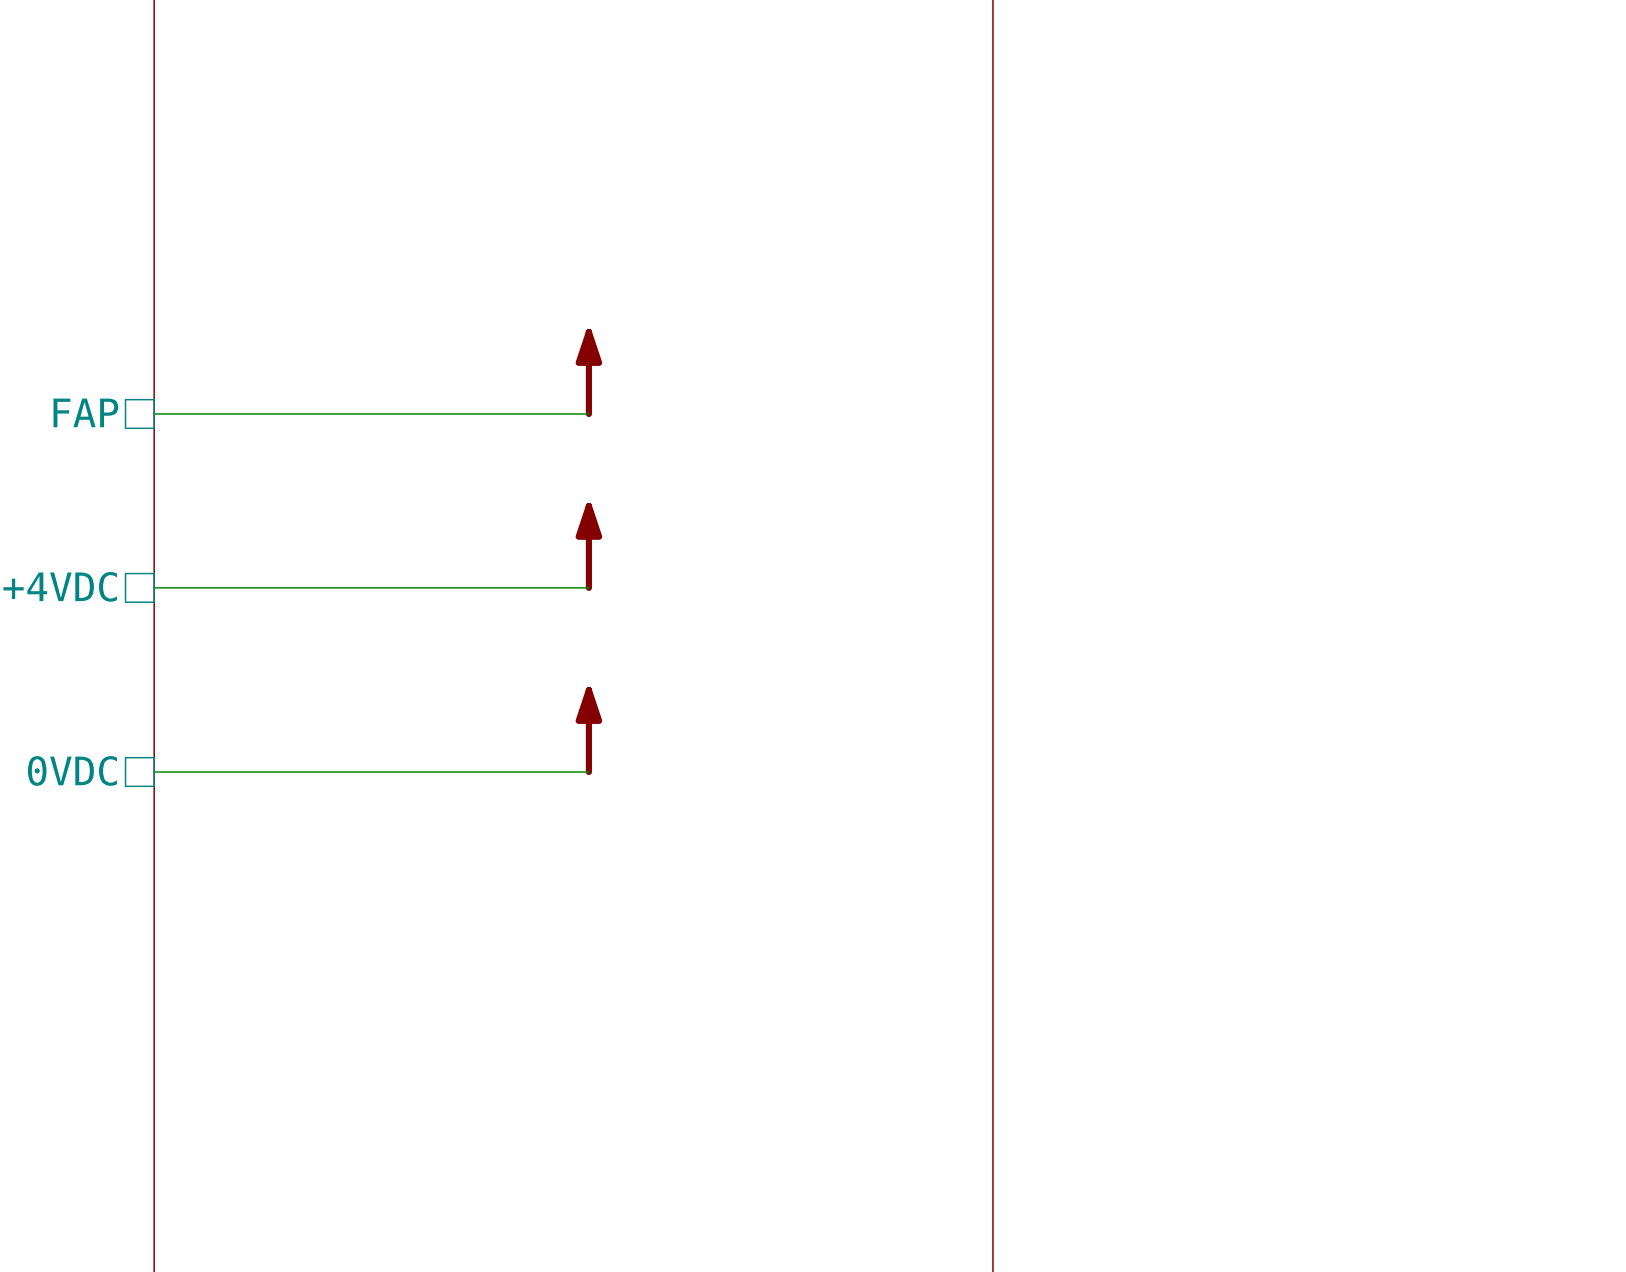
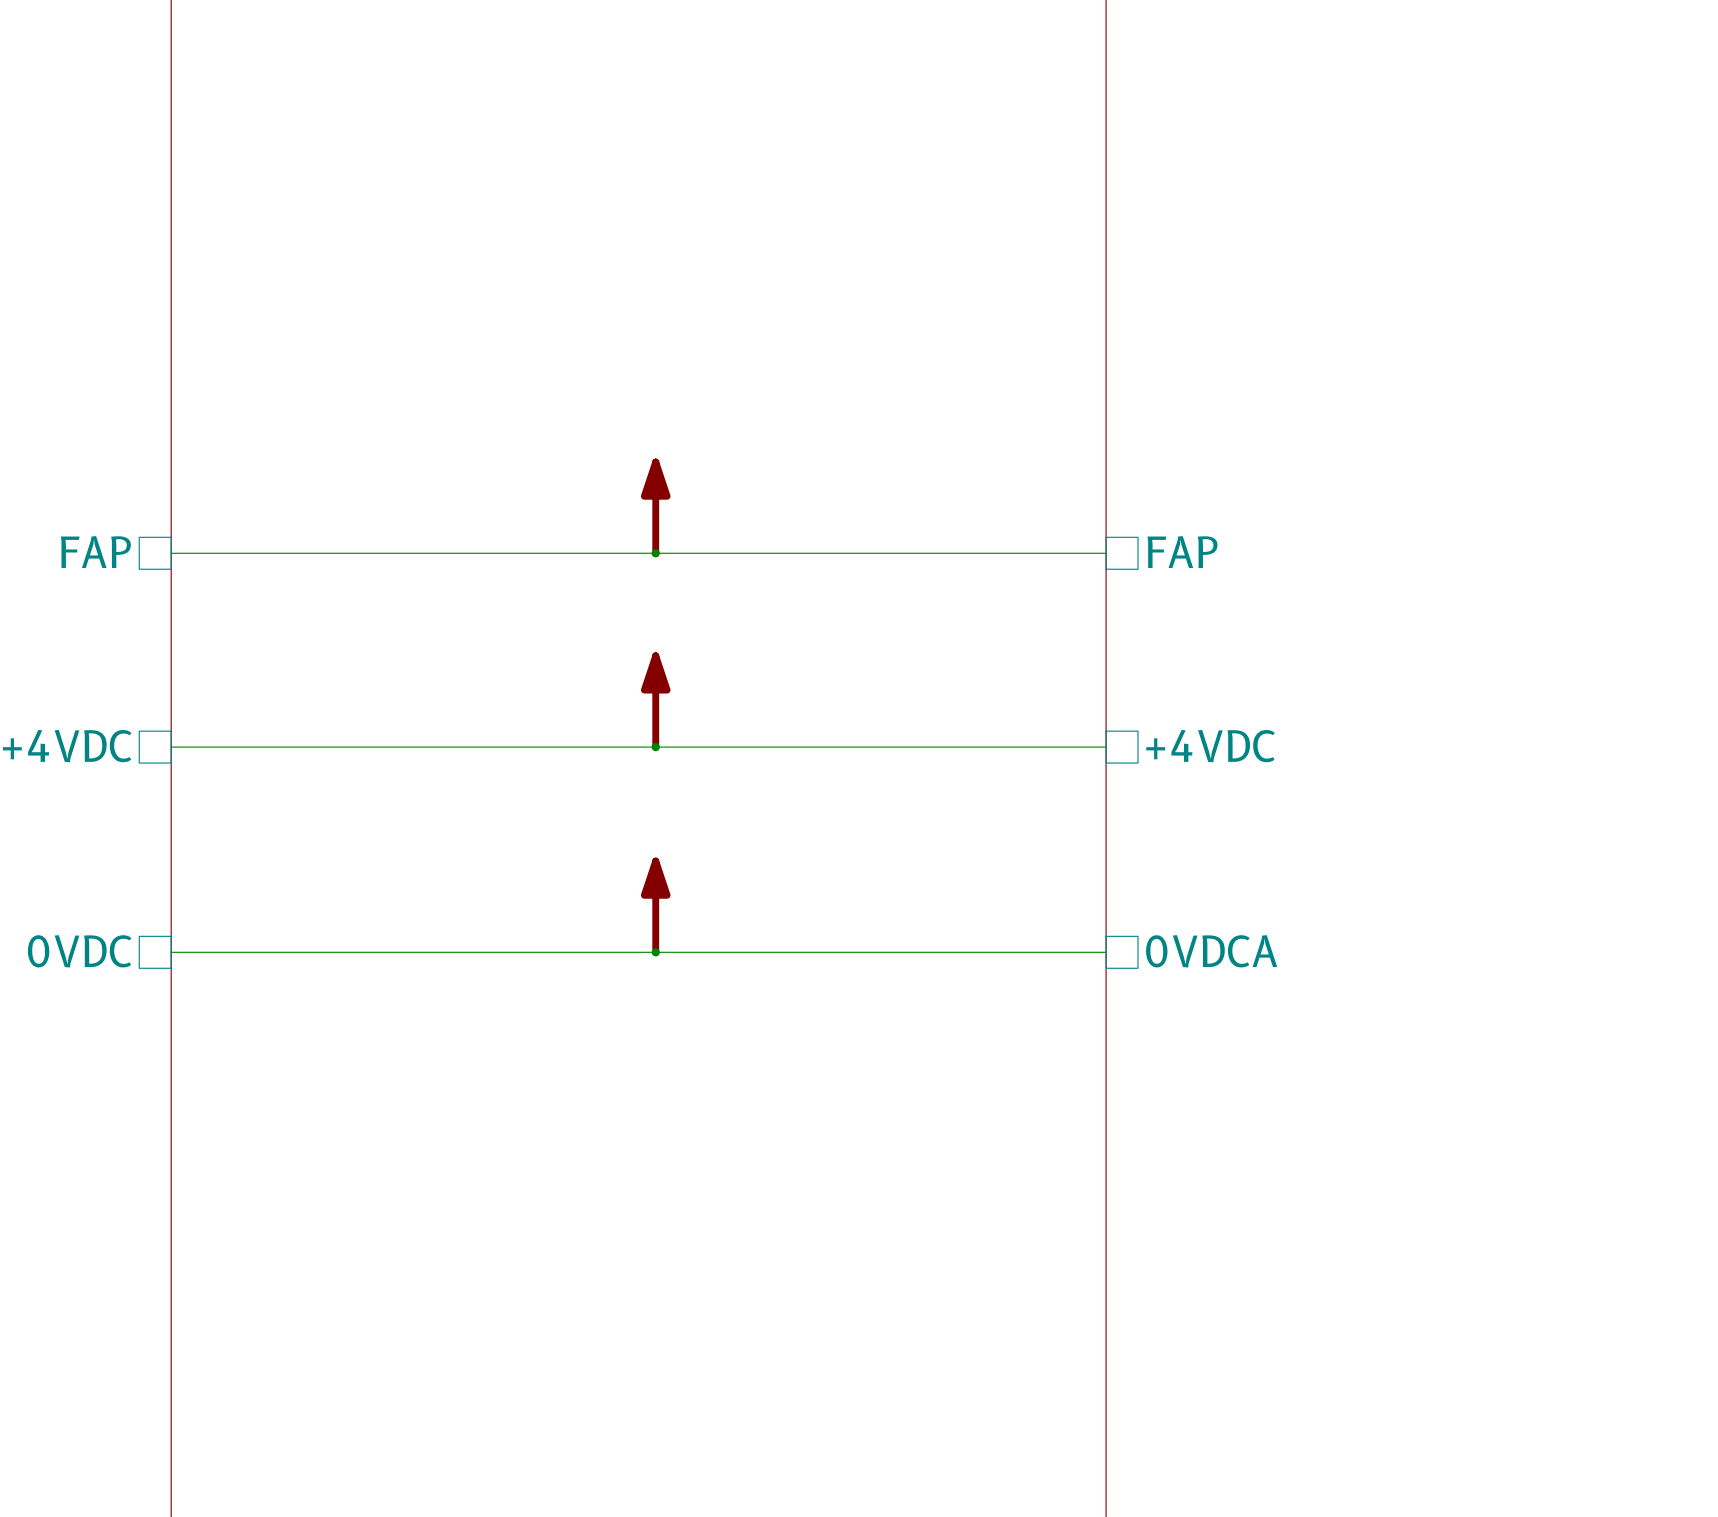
sheet pin: none -> FAP (1182, 552)
wire: none -> (655, 553) (1106, 553)
junction: none -> (655, 553)
sheet pin: none -> +4VDC (1210, 746)
wire: none -> (655, 747) (1106, 747)
junction: none -> (655, 747)
sheet pin: none -> 0VDCA (1211, 951)
wire: none -> (655, 952) (1106, 952)
junction: none -> (655, 952)

